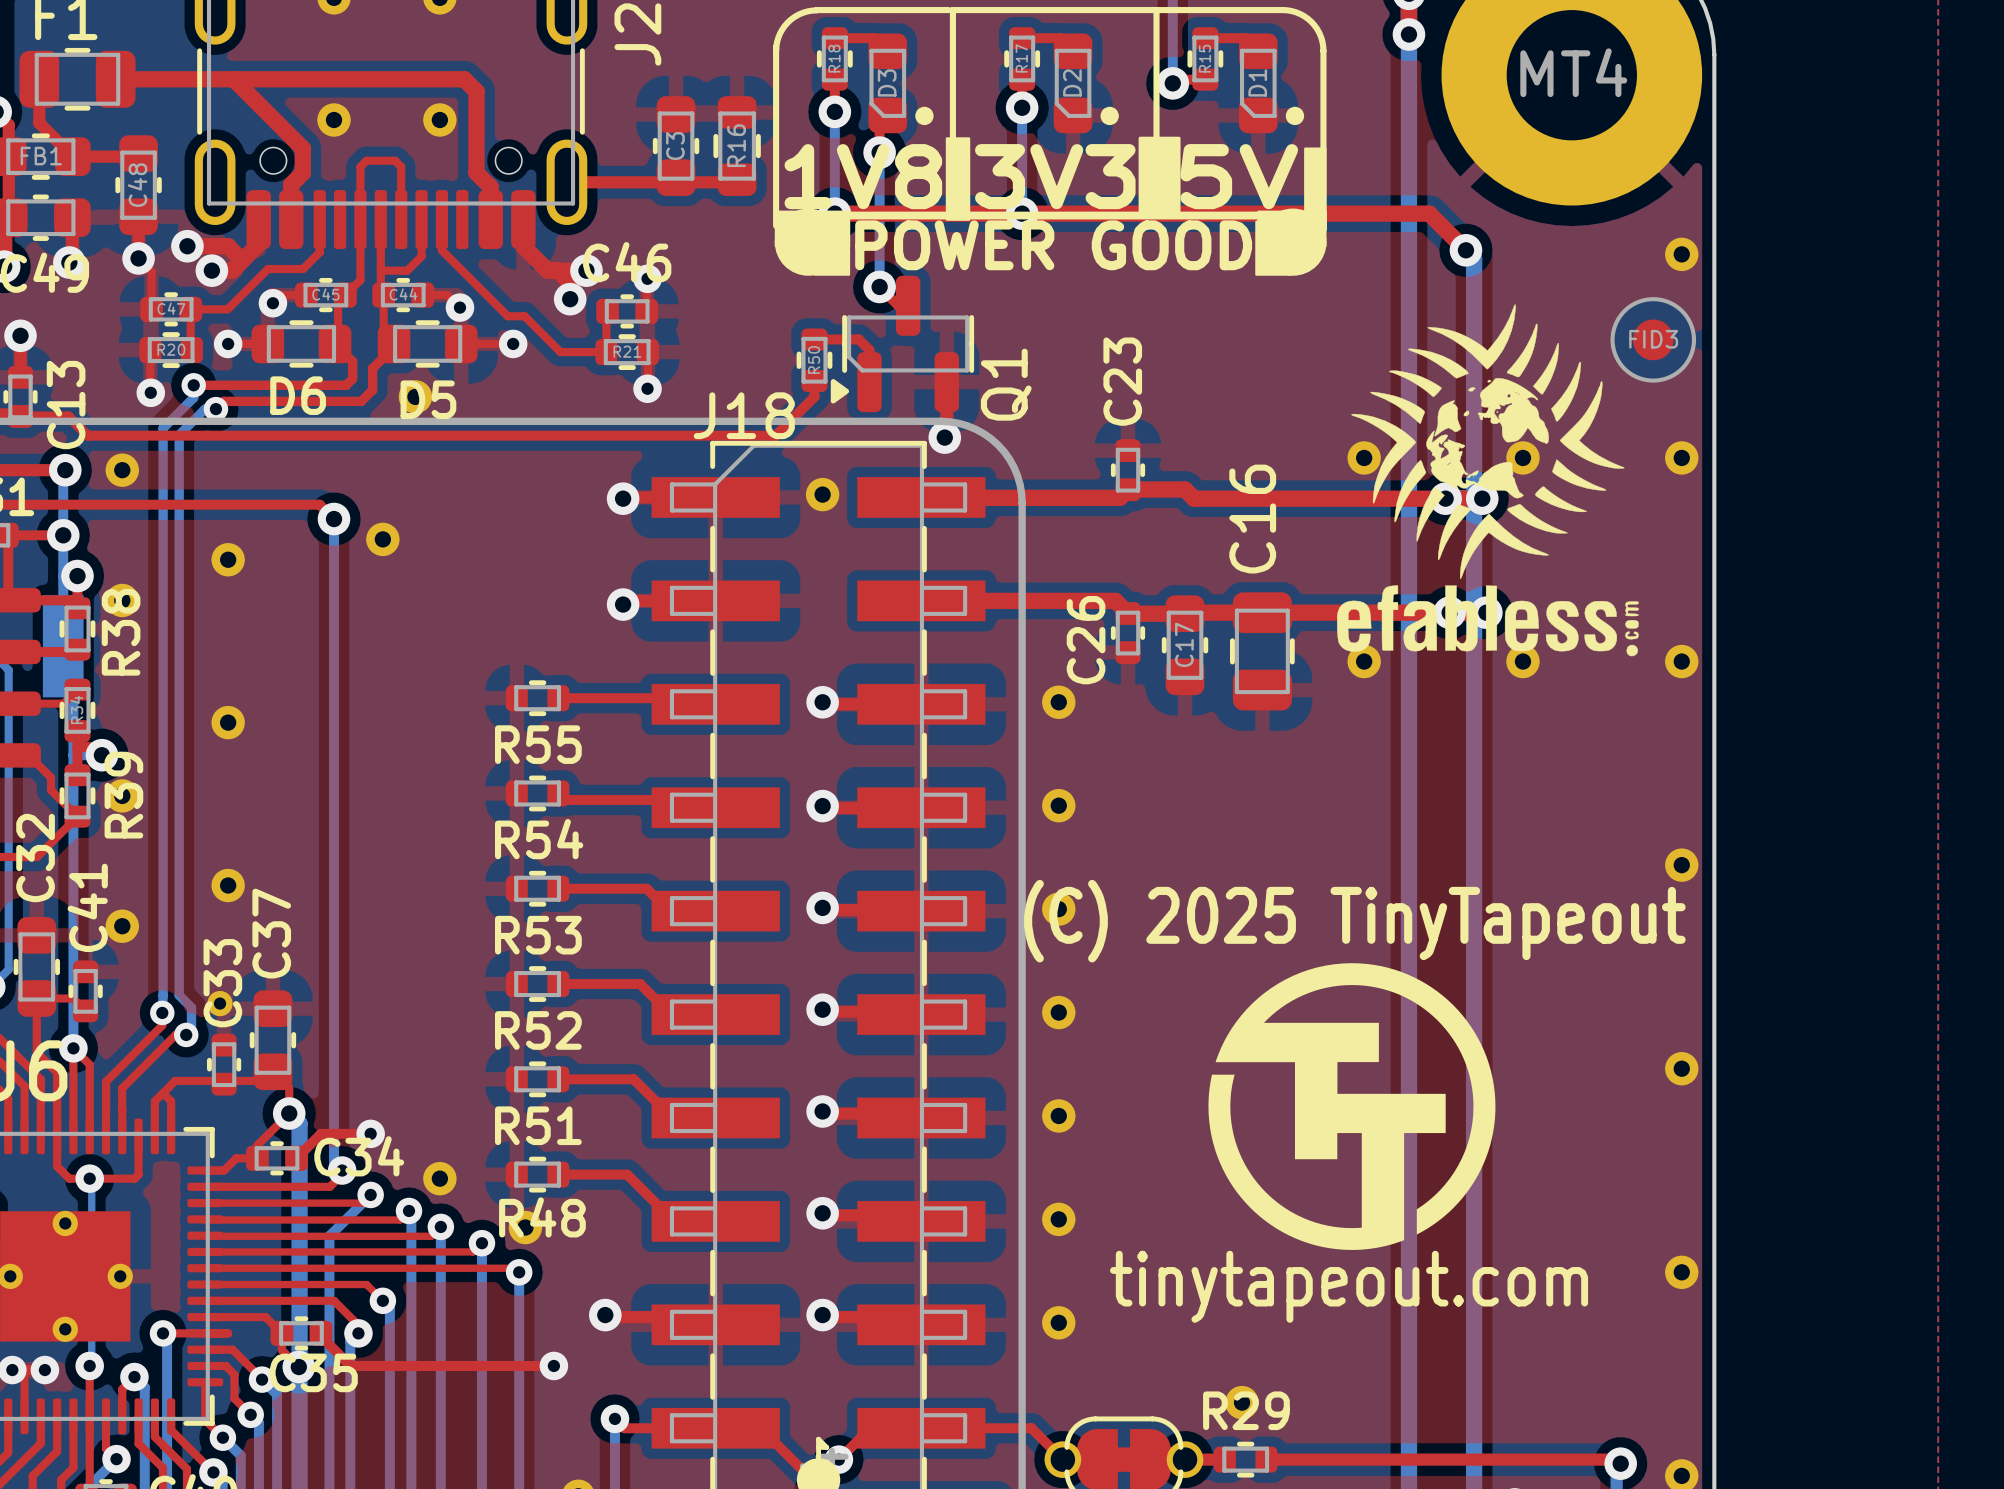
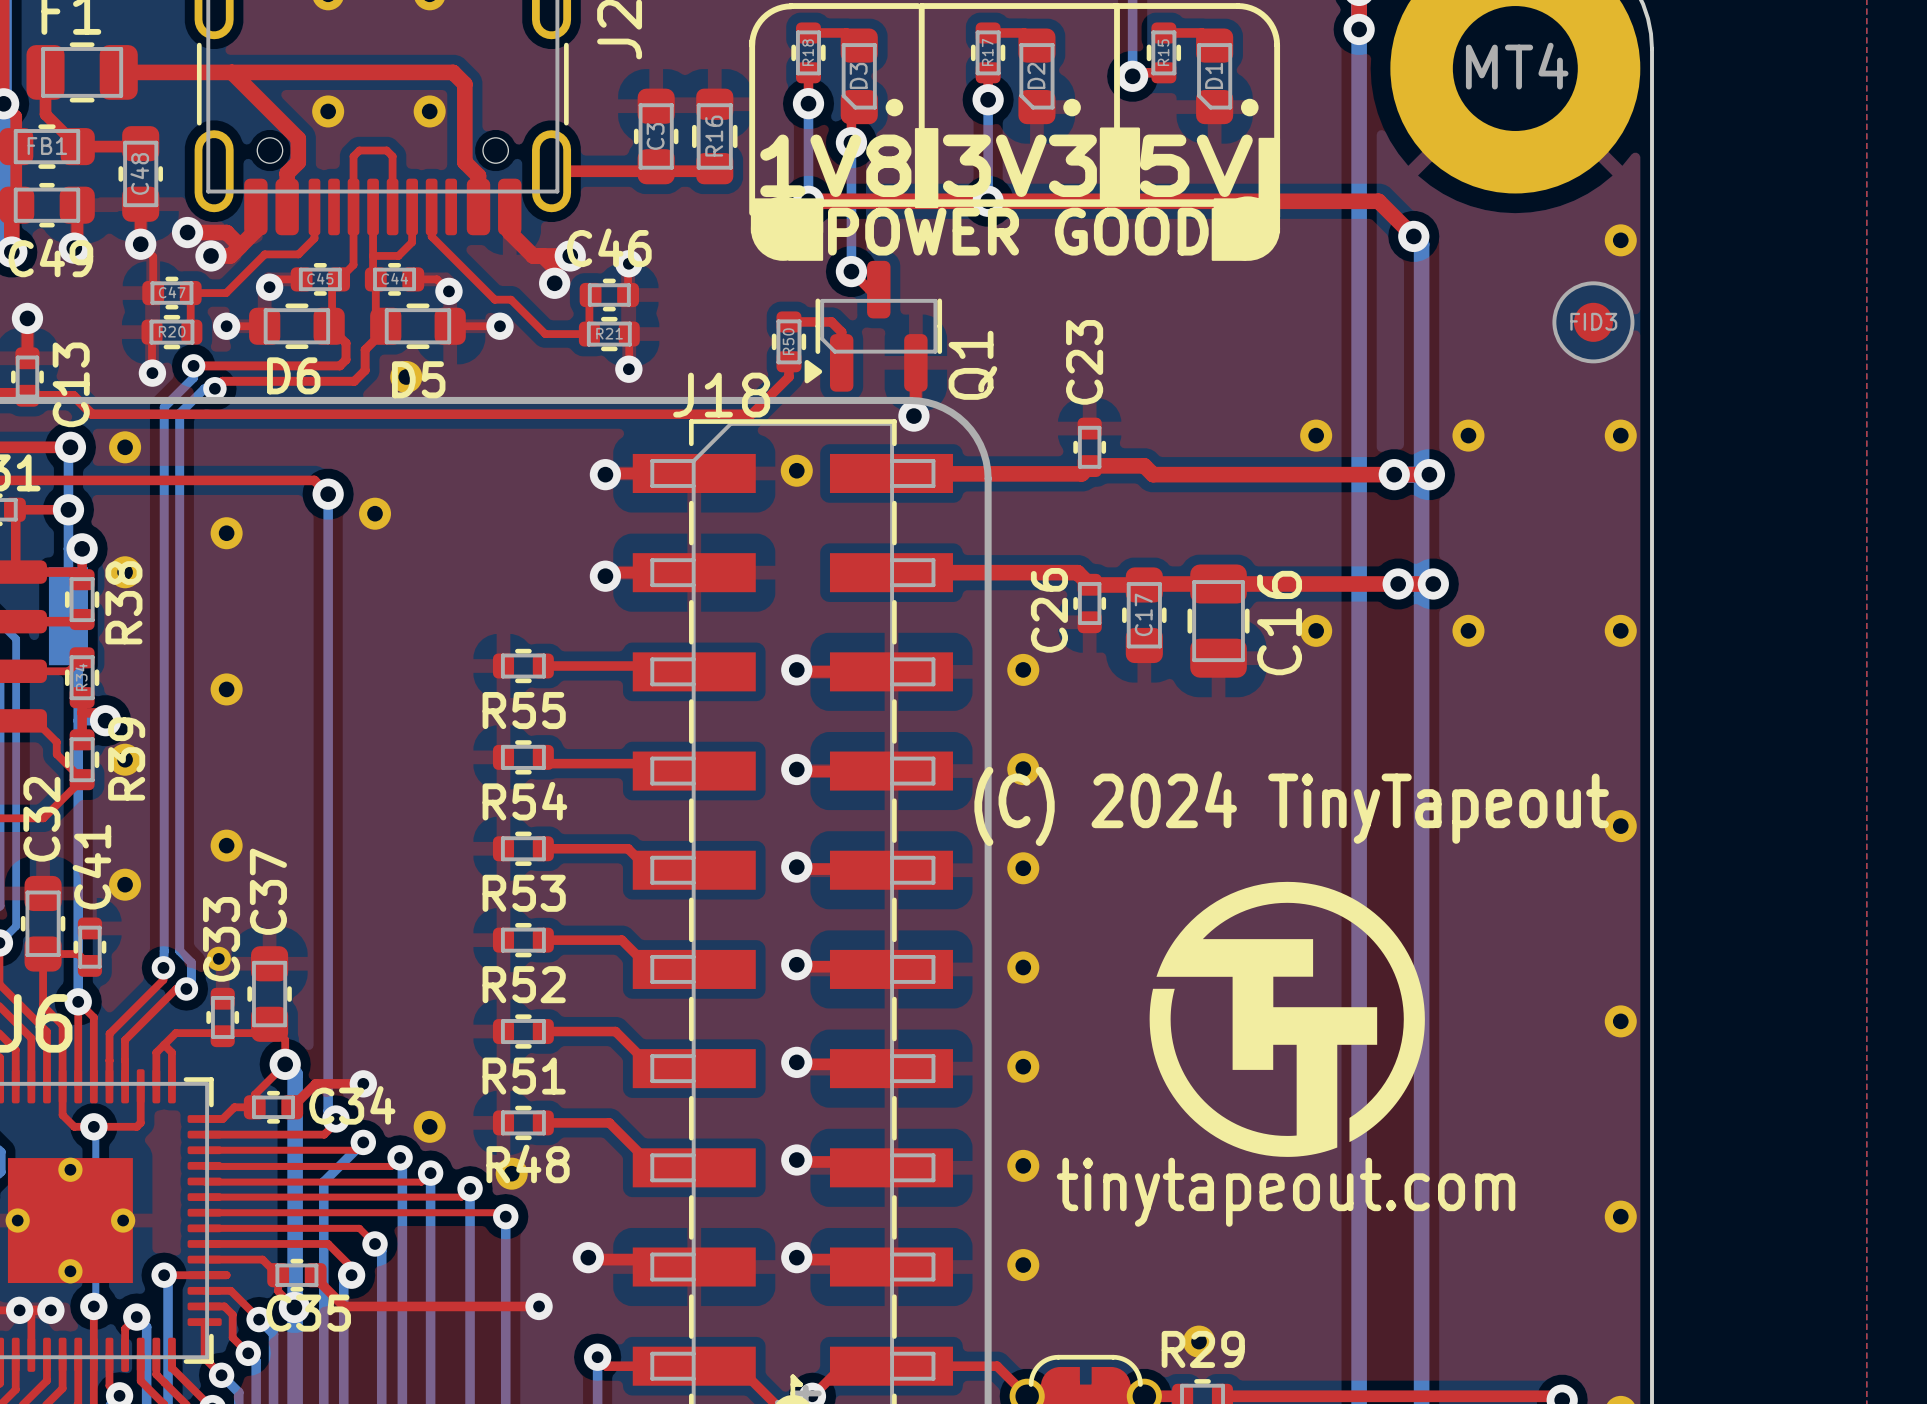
drawing: [1337, 304, 1639, 657] -> none
C16 name position: C16 (1252, 519) -> C16 (1279, 623)
text: (C) 2025 TinyTapeout (1354, 921) -> (C) 2024 TinyTapeout (1291, 806)
drawing position: (1351, 1106) -> (1287, 1019)
text position: tinytapeout.com (1349, 1286) -> tinytapeout.com (1286, 1192)

